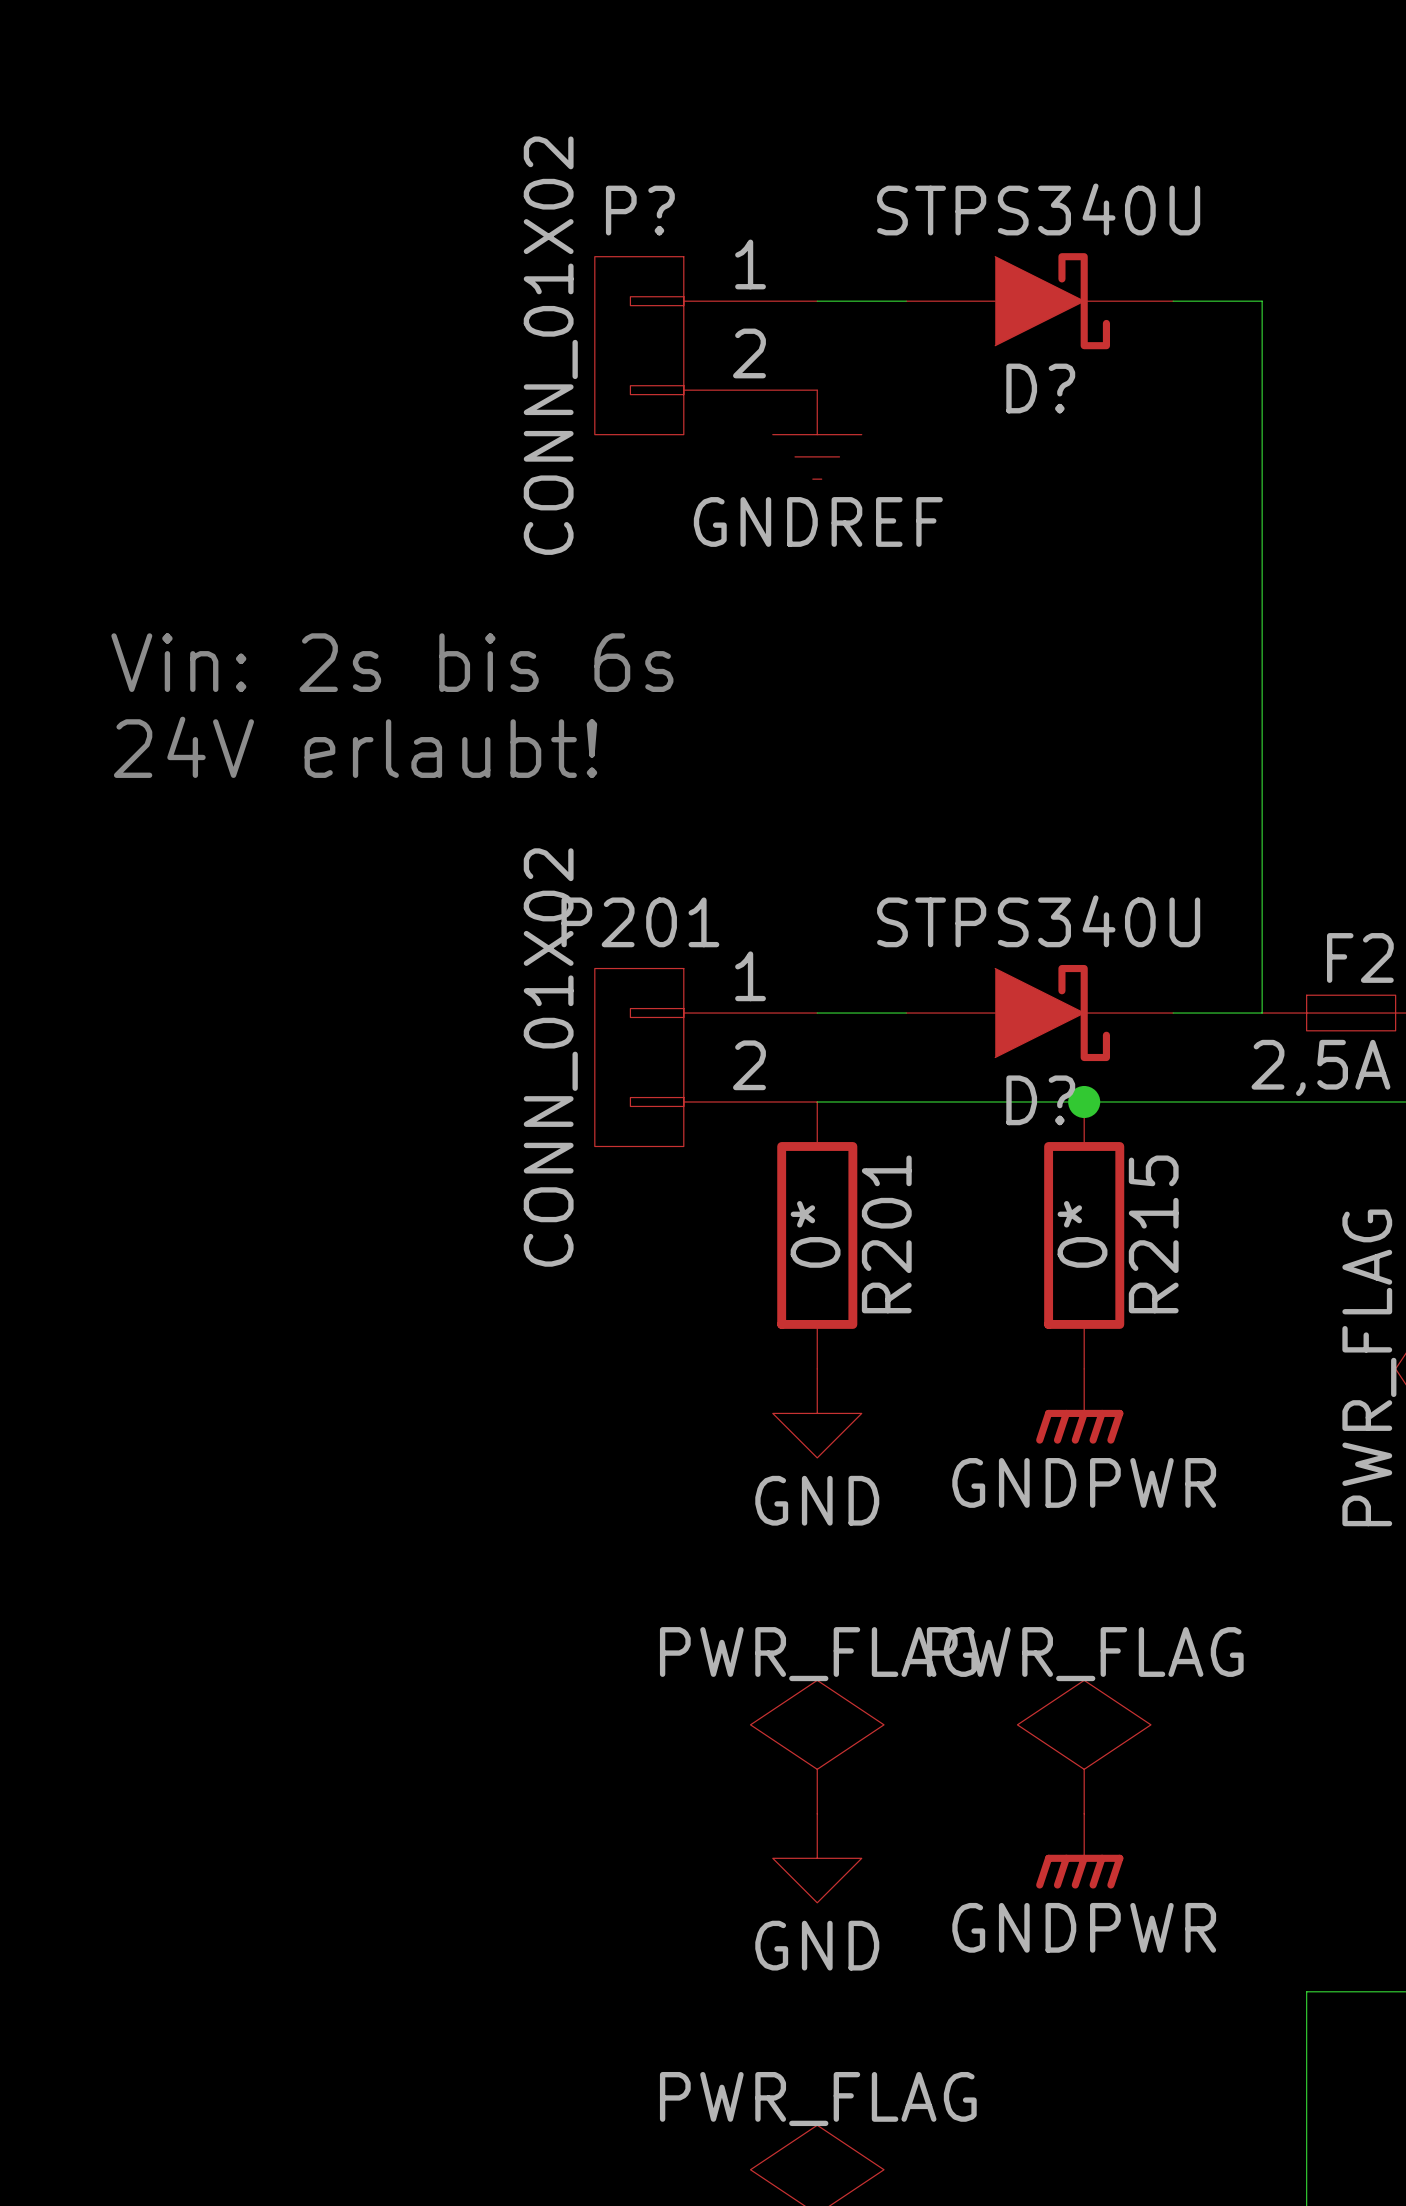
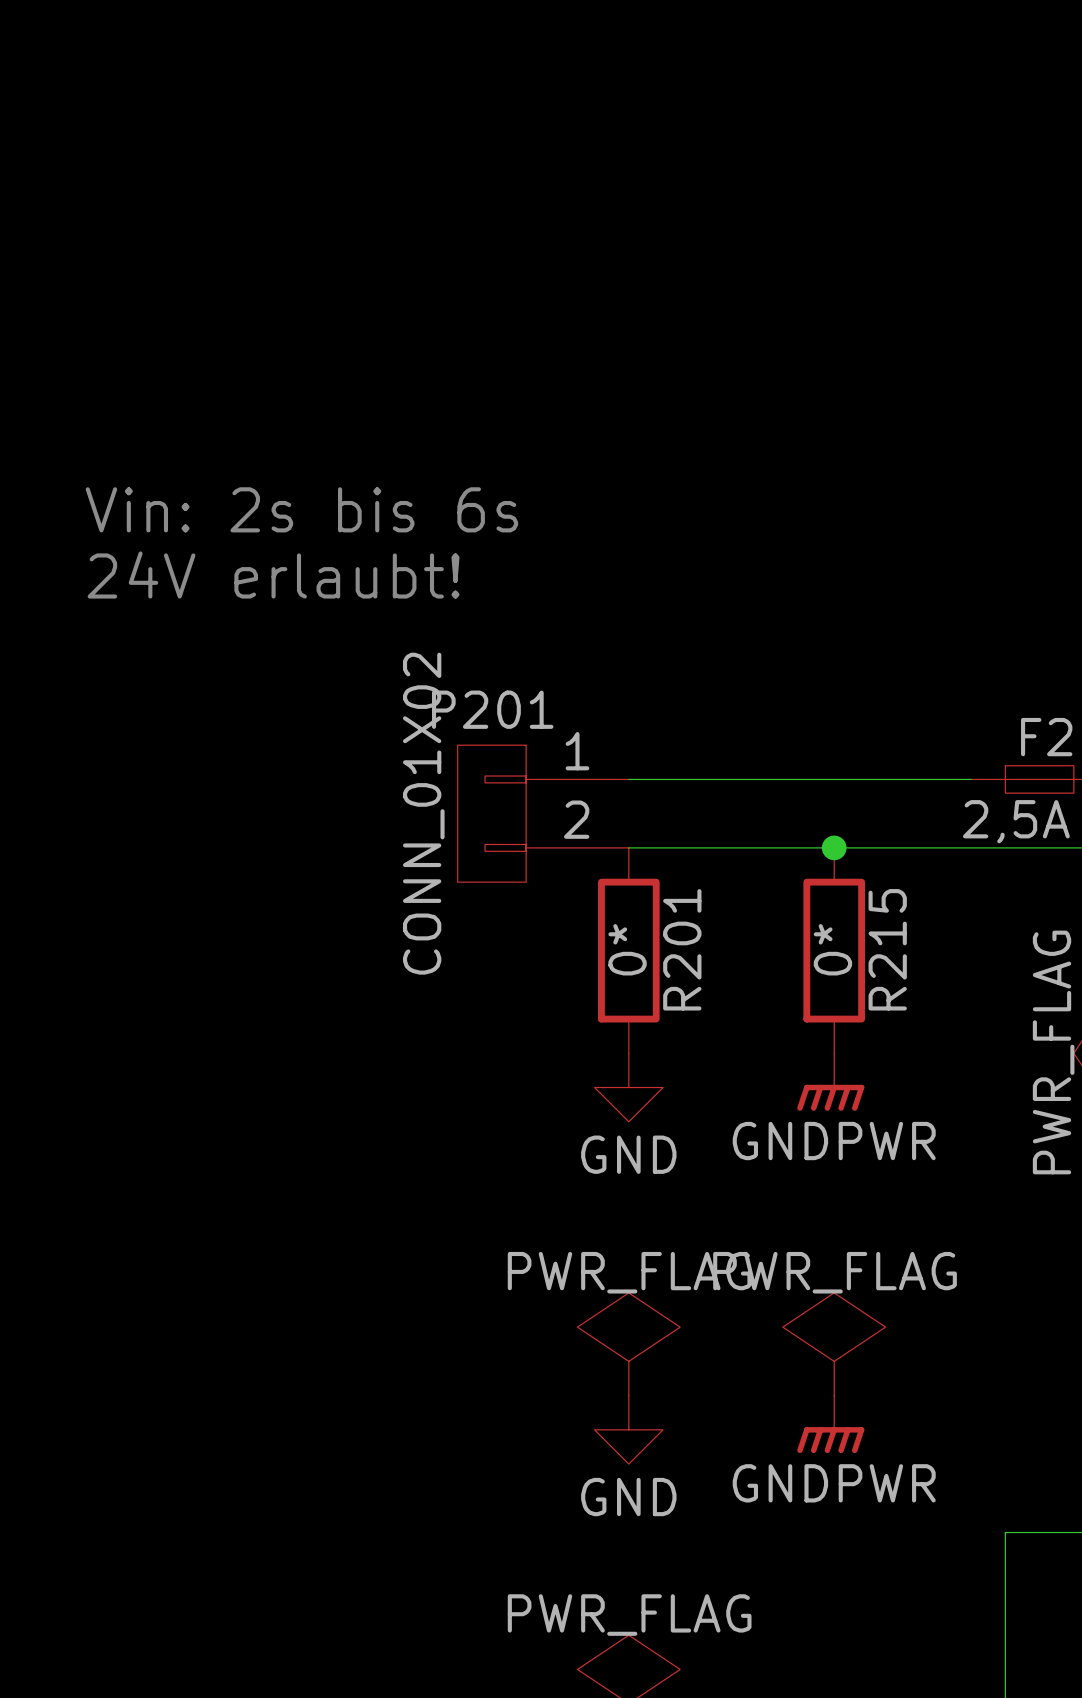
wire: (817, 301) (906, 301) -> none
D?: STPS340U (1039, 301) -> none
wire: (1173, 301) (1262, 301) (1262, 1013) -> none
P?: CONN_01X02 (706, 345) -> none
power symbol: GNDREF (817, 434) -> none
D?: STPS340U (1039, 1013) -> none

